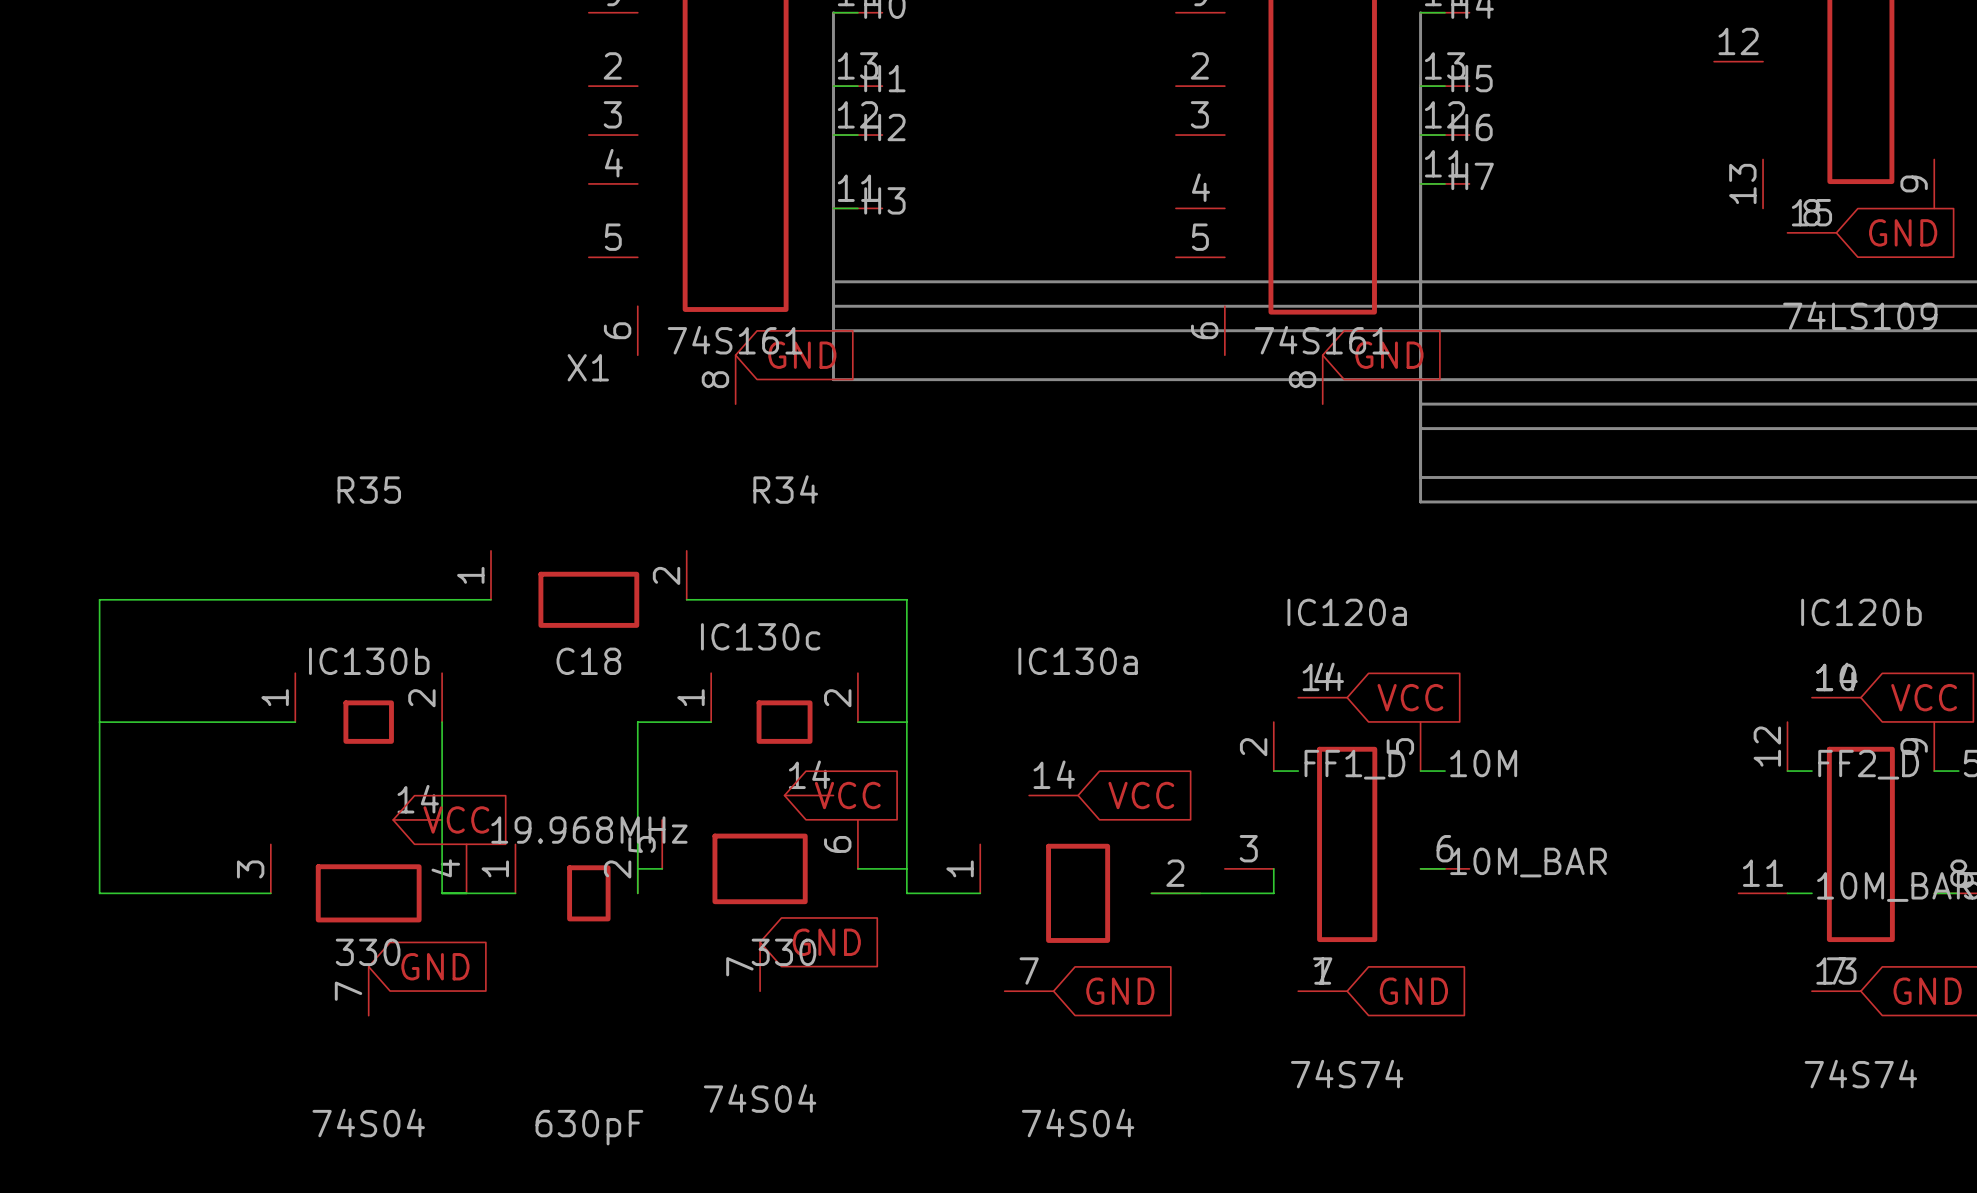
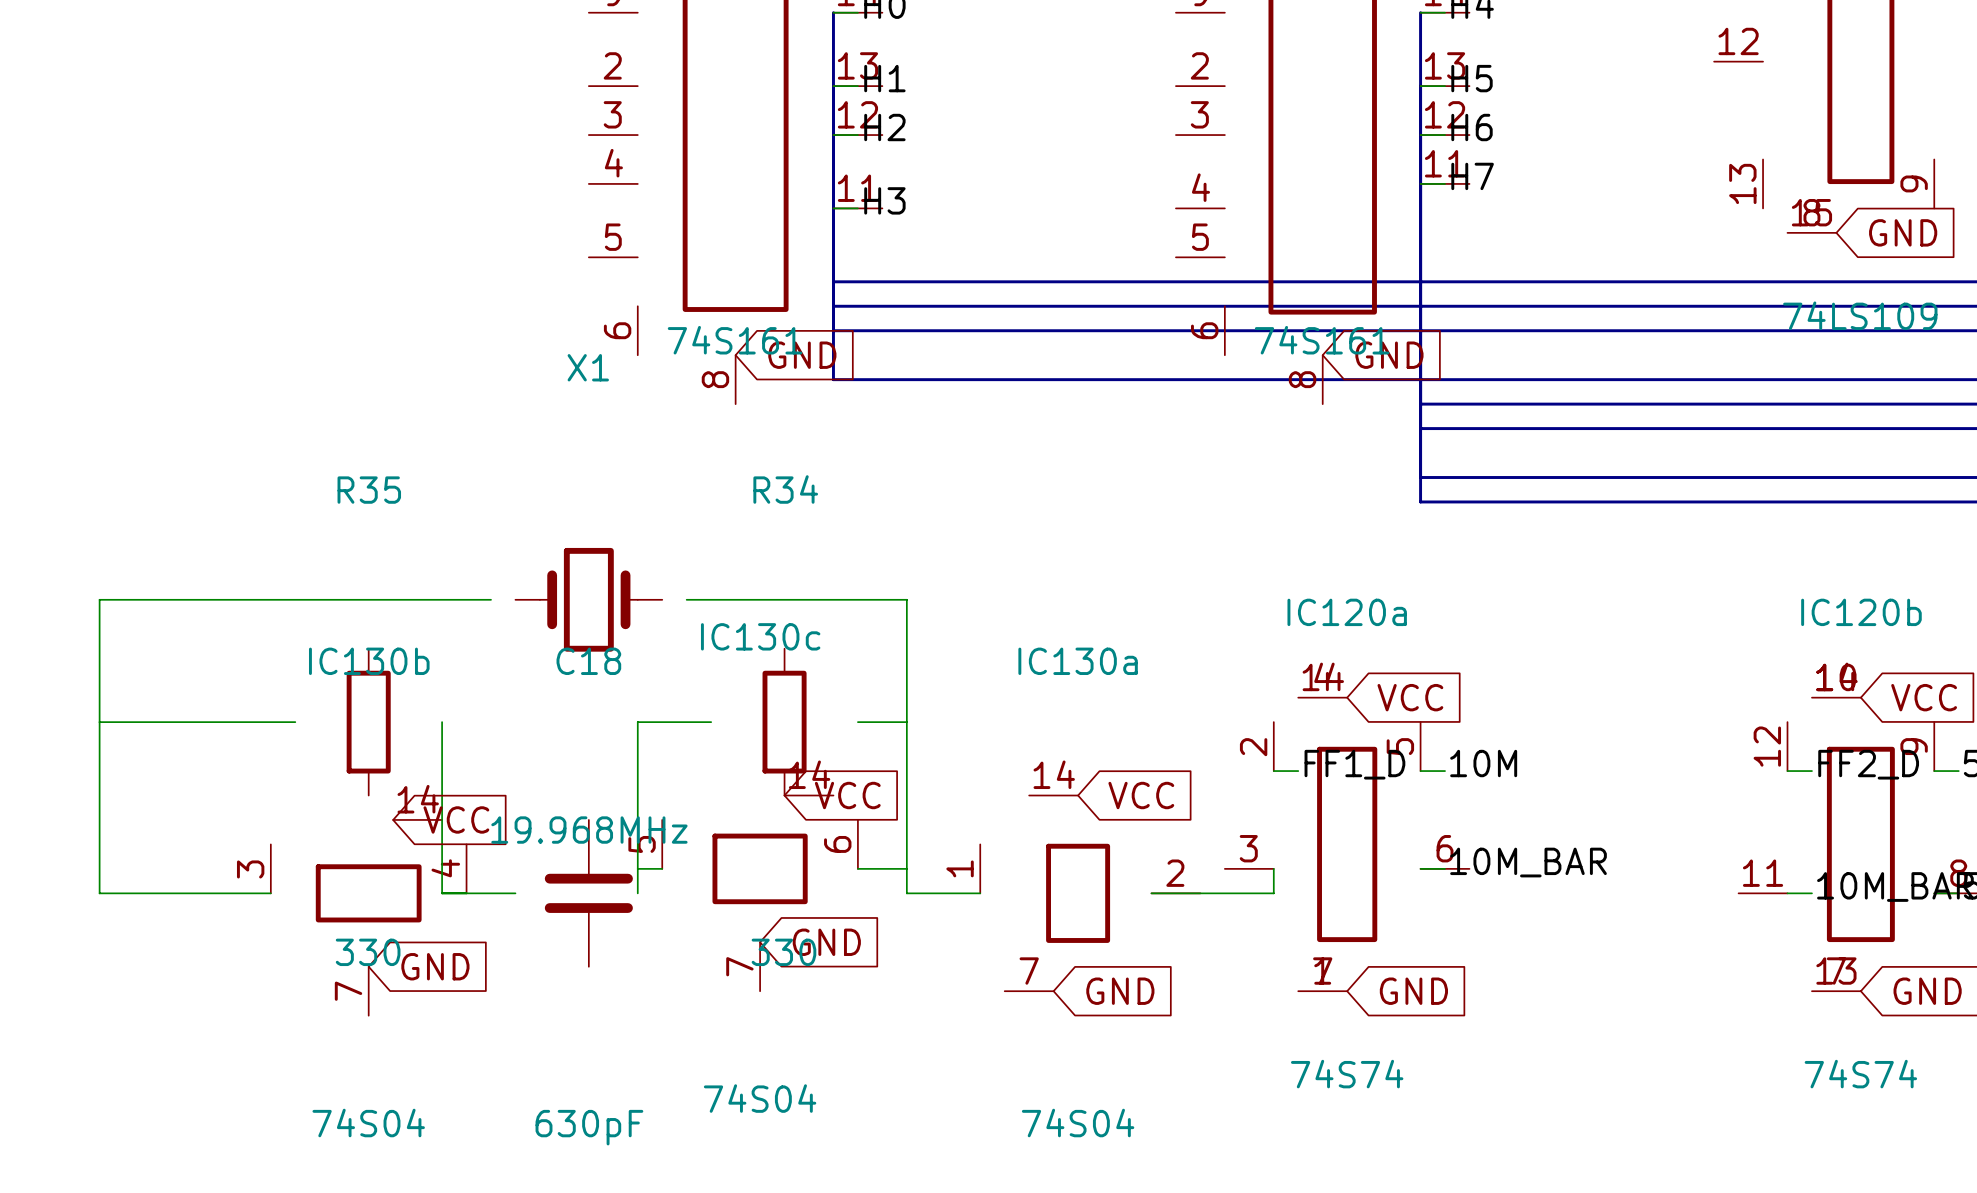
X1 symbol: [491, 550, 687, 628] -> [515, 547, 663, 652]
R35 symbol: [295, 673, 443, 744] -> [346, 648, 391, 796]
R34 symbol: [711, 673, 858, 744] -> [762, 648, 807, 796]
C18 symbol: [515, 844, 638, 922] -> [544, 819, 633, 967]

